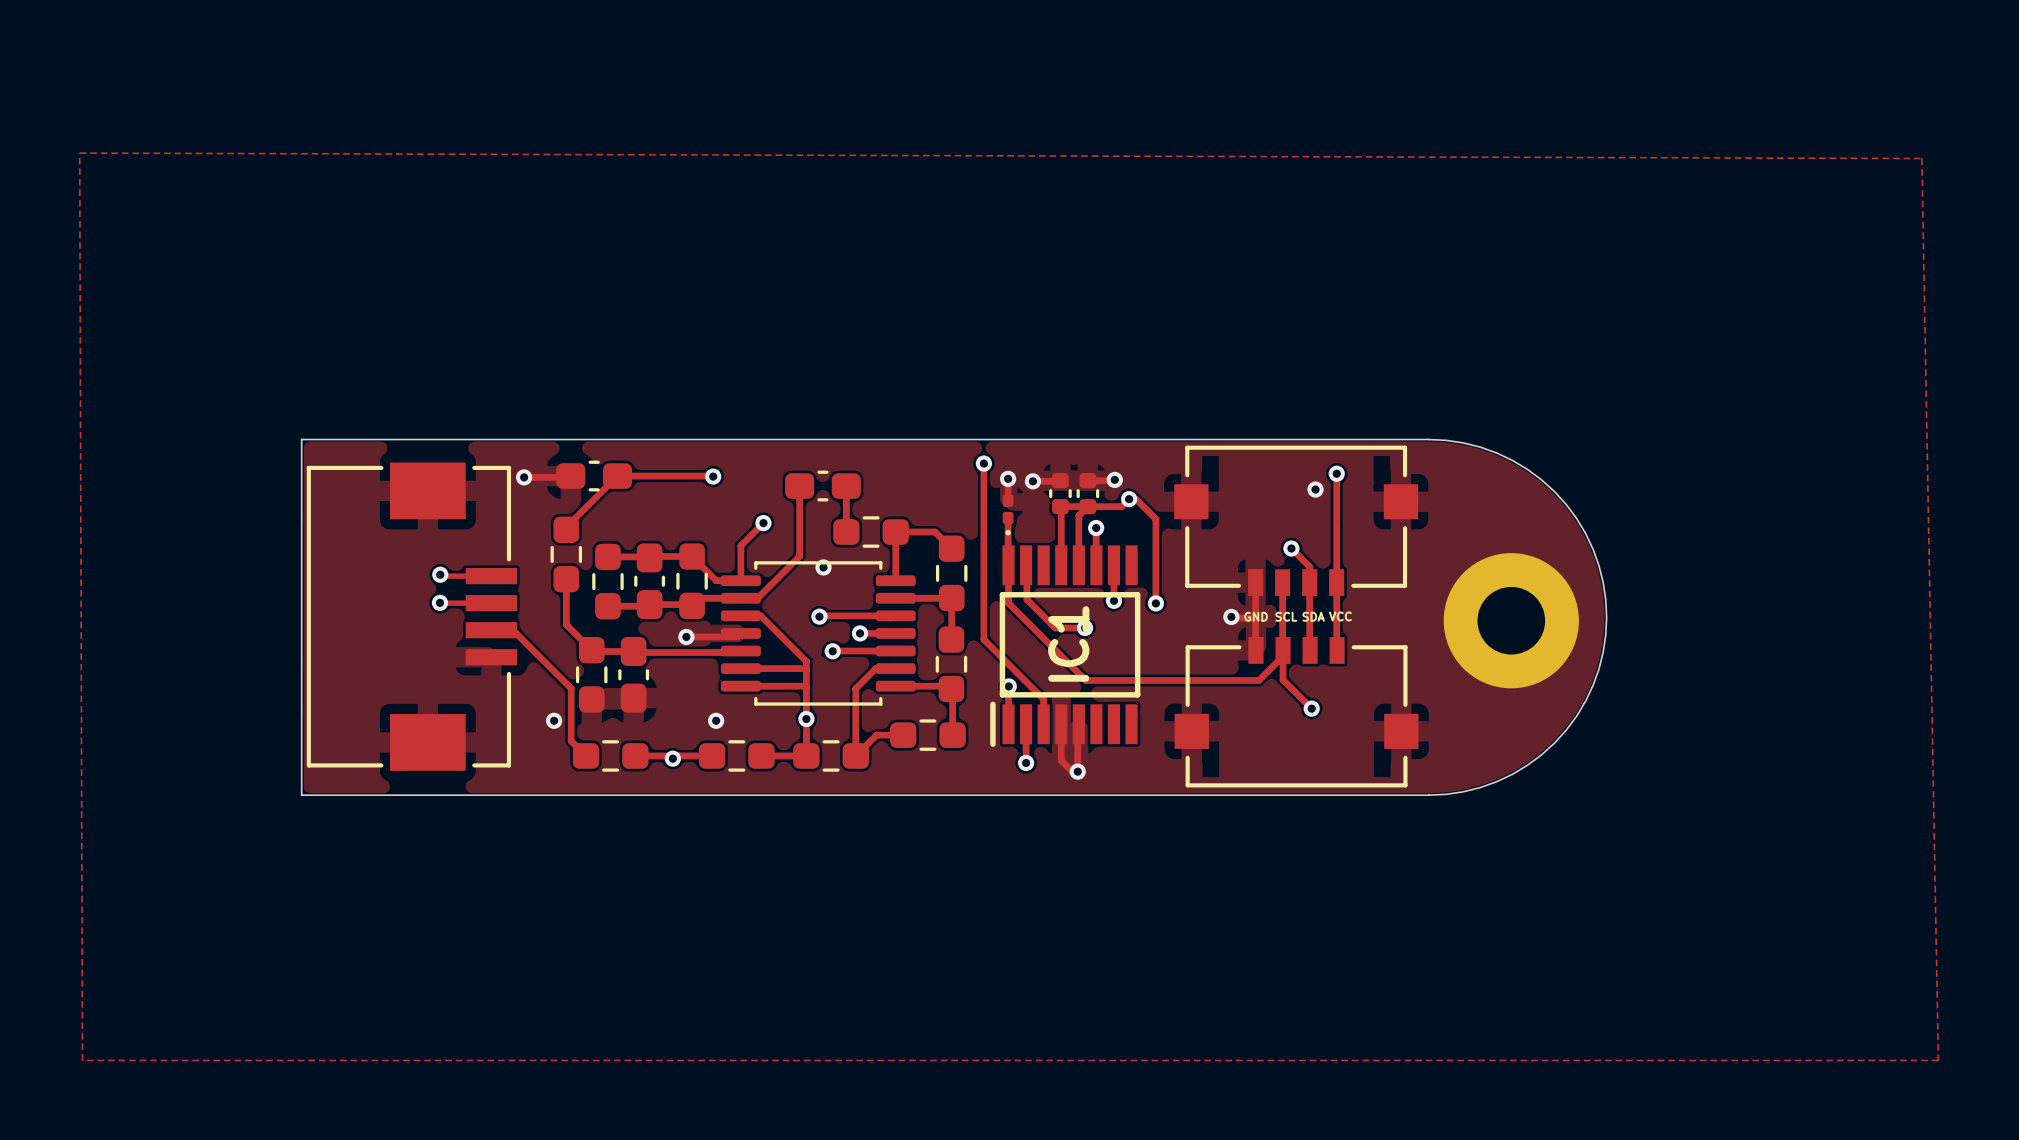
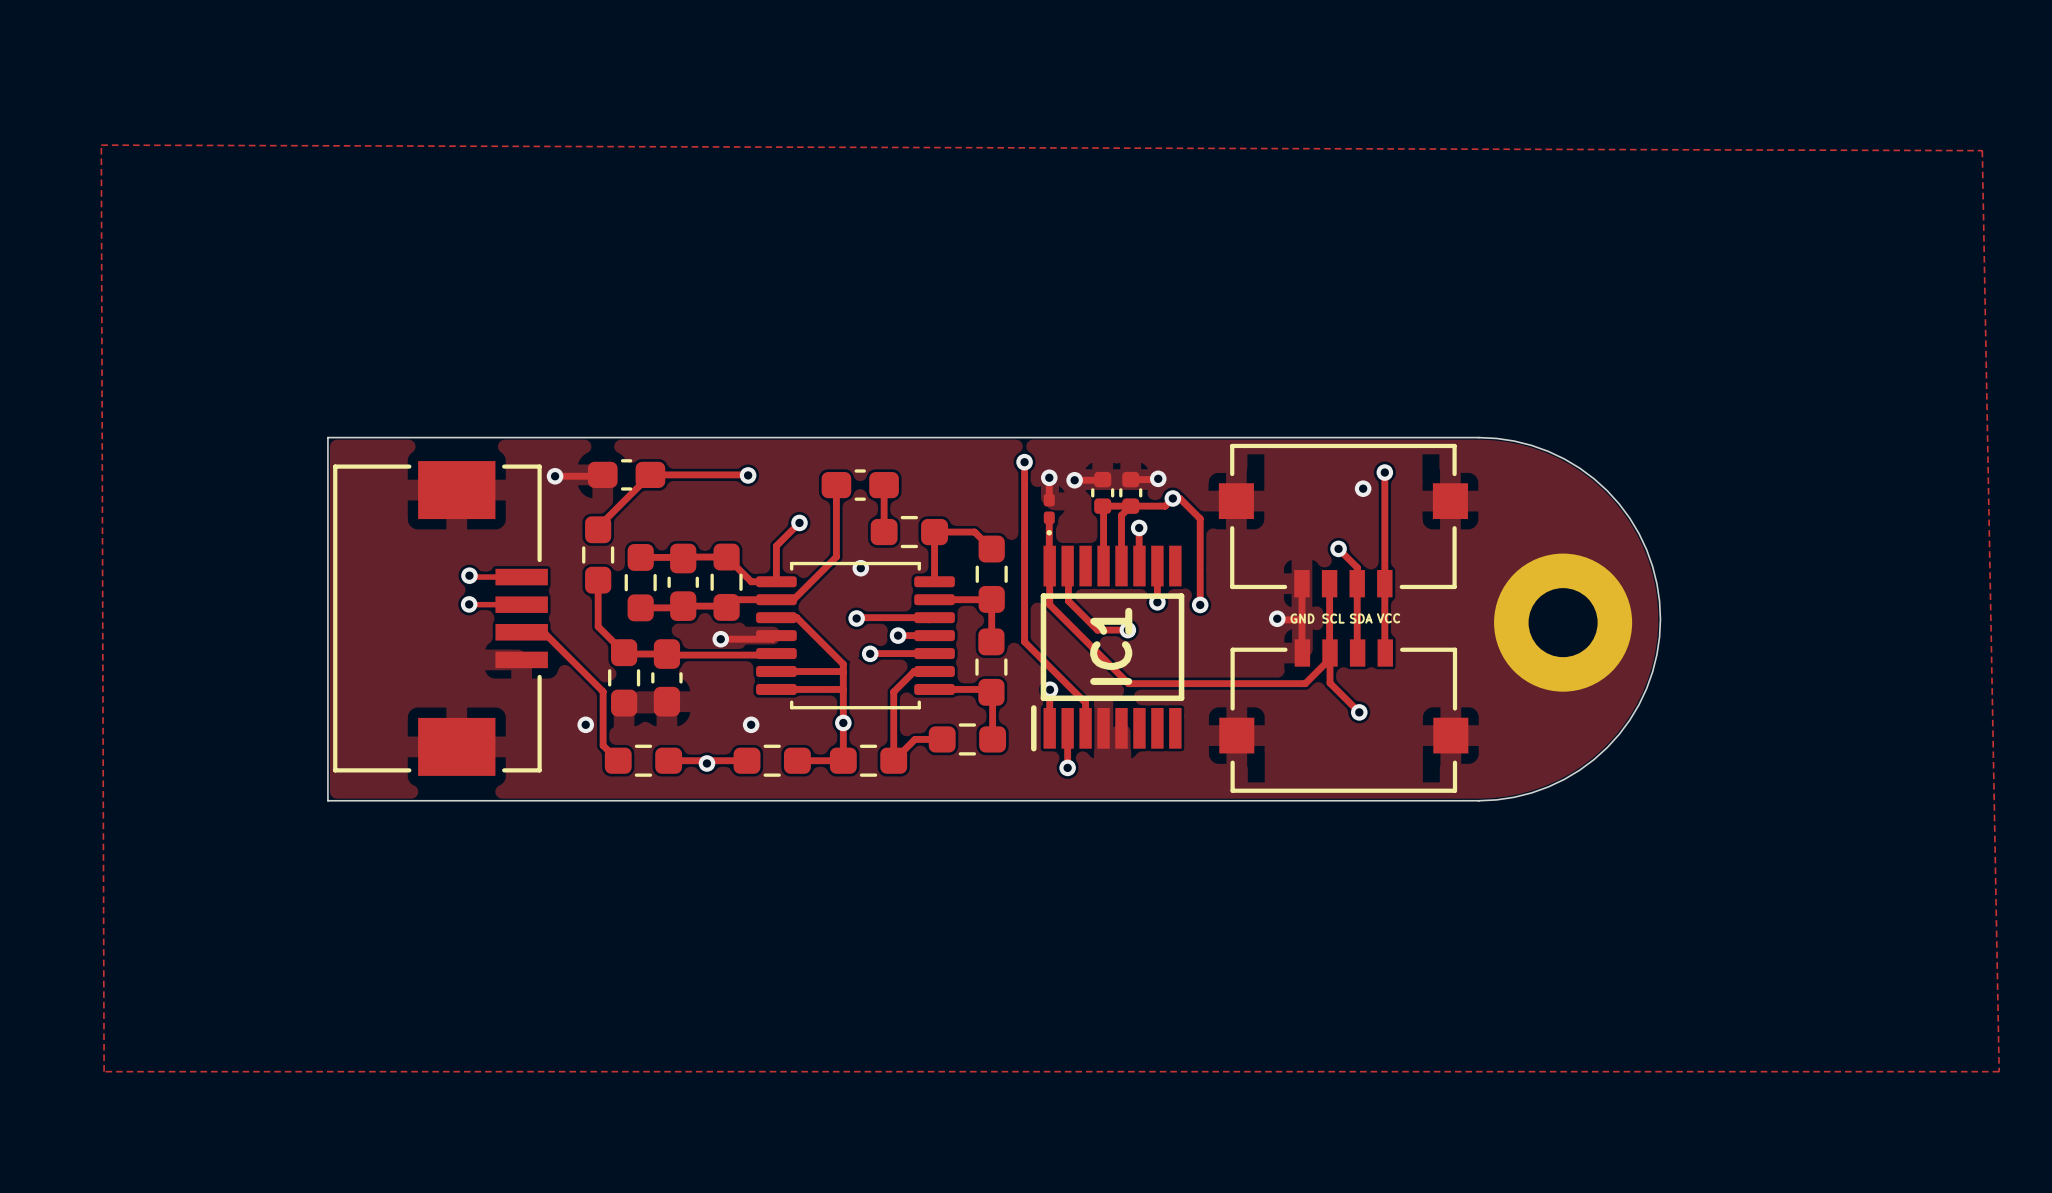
track: (1061, 724) (1061, 760) (1072, 771) (1077, 771) (1078, 724) -> none
via: (1077, 771) -> none

